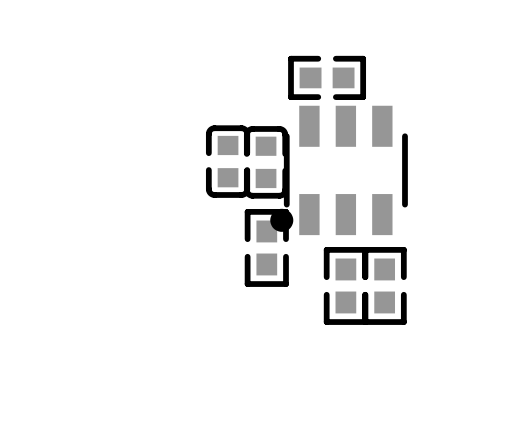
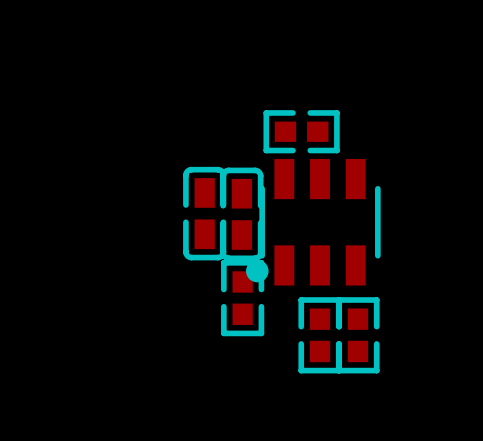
part footprint: [205, 125, 251, 198] -> [183, 166, 227, 261]
part footprint: [243, 126, 289, 199] -> [220, 167, 264, 262]

